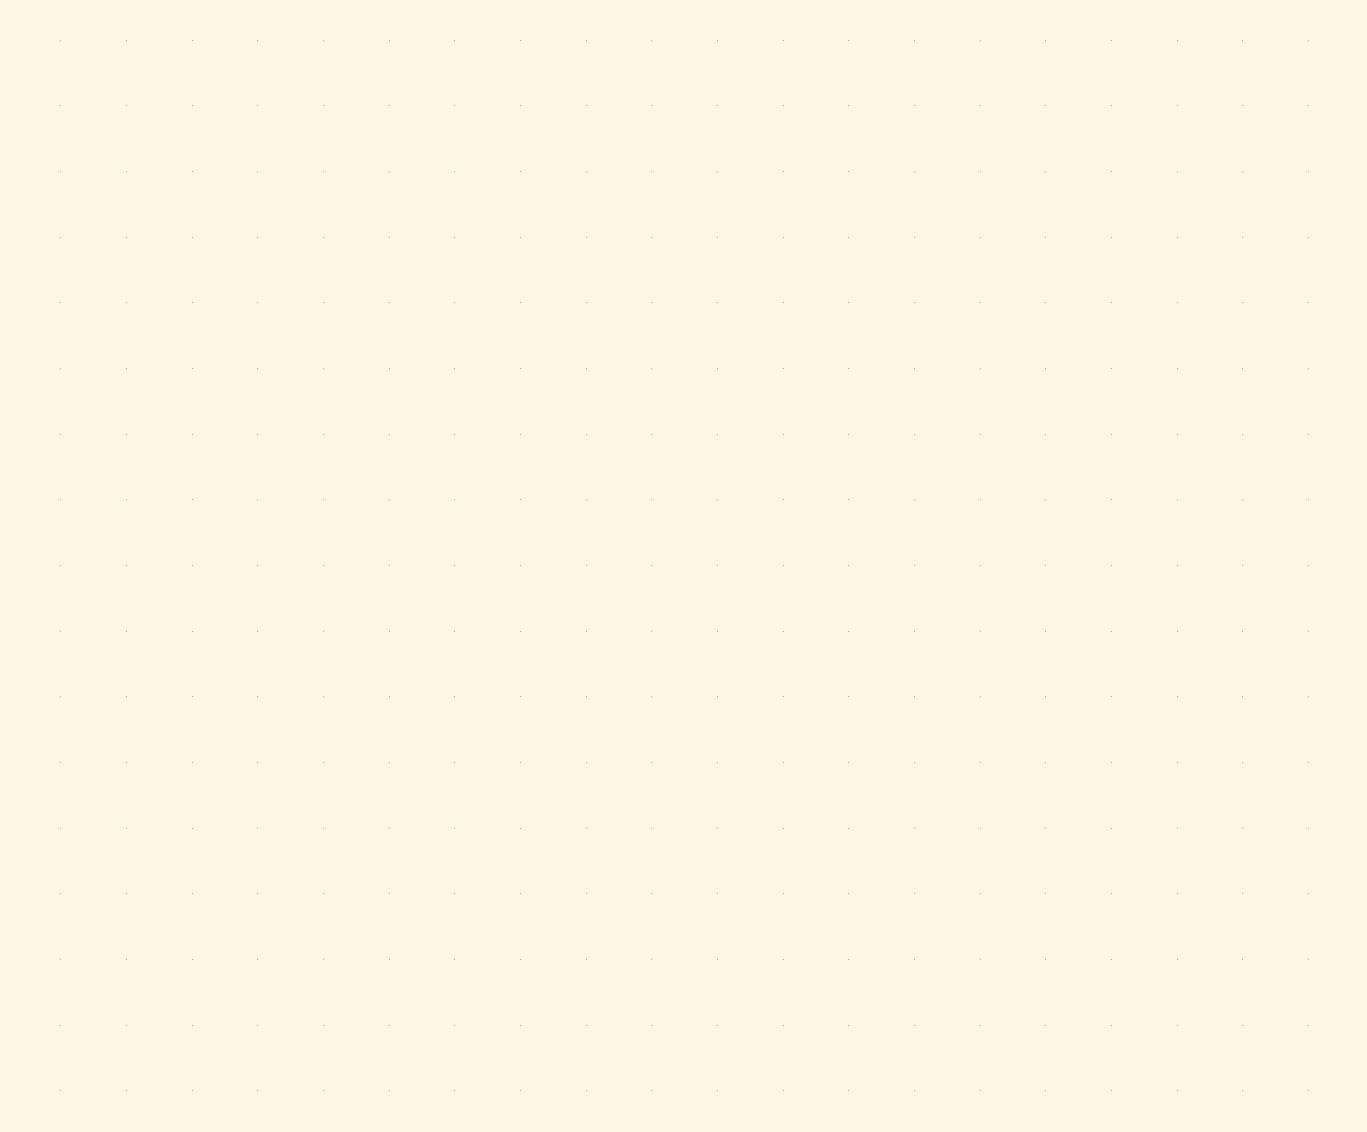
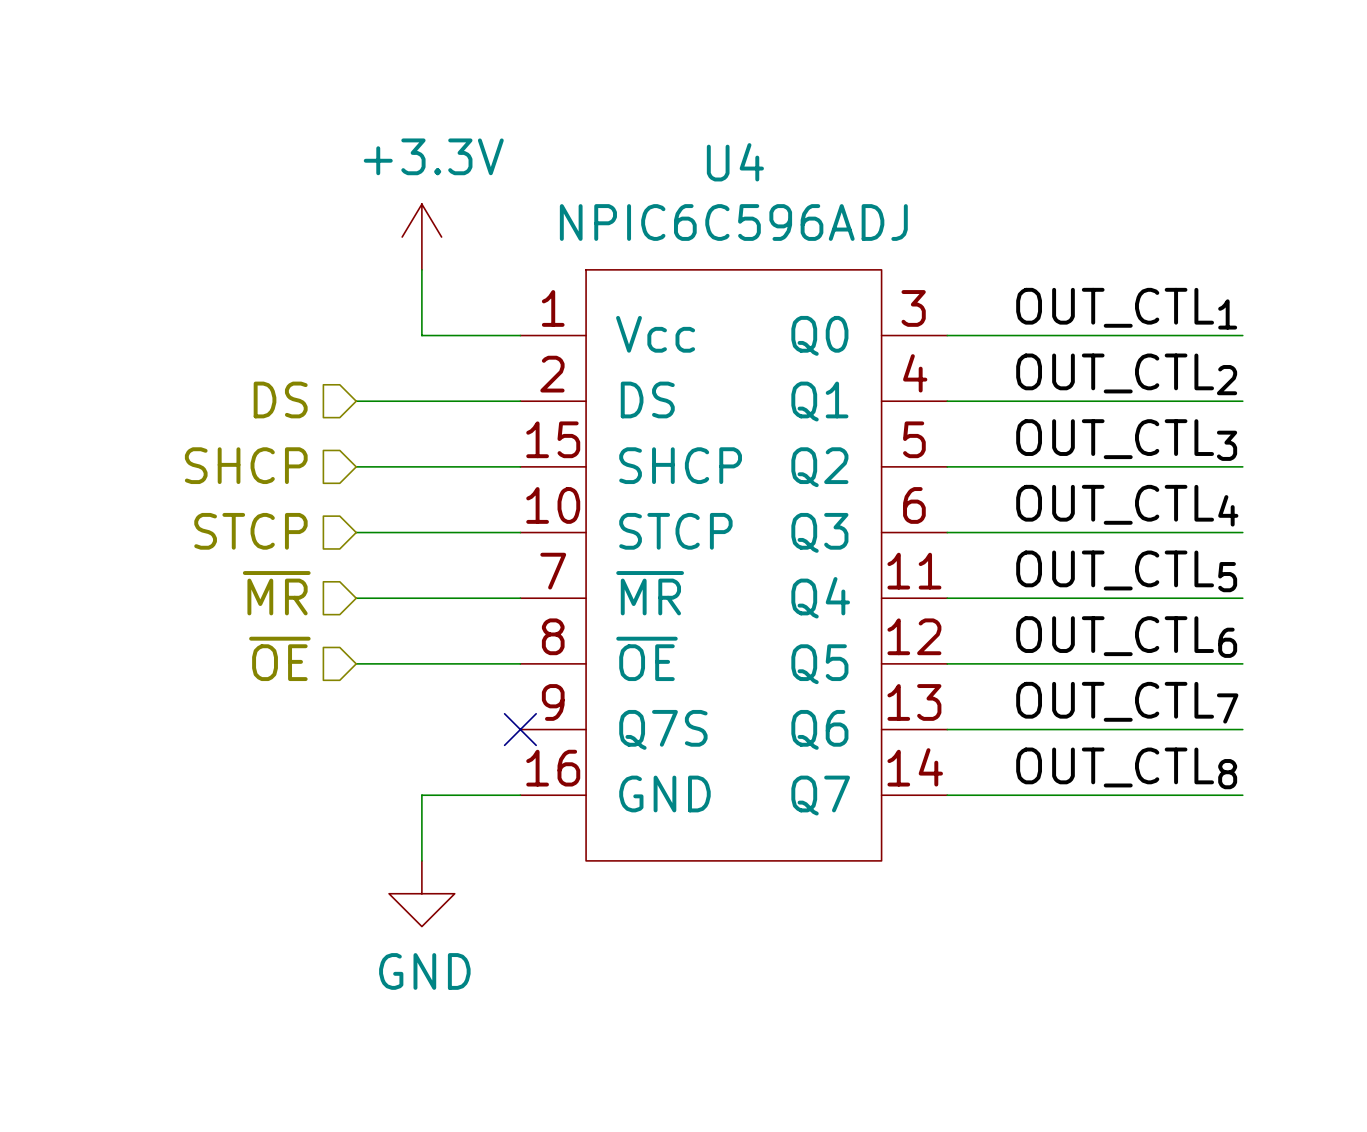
power symbol: none -> +3.3V (421, 237)
wire: none -> (421, 269) (421, 335) (520, 335)
label: none -> OUT_CTL1 (1126, 308)
wire: none -> (947, 335) (1242, 335)
label: none -> OUT_CTL2 (1126, 374)
hierarchical label: none -> DS (280, 399)
wire: none -> (356, 401) (520, 401)
wire: none -> (947, 401) (1242, 401)
label: none -> OUT_CTL3 (1126, 440)
hierarchical label: none -> SHCP (246, 465)
wire: none -> (356, 466) (520, 466)
wire: none -> (947, 466) (1242, 466)
label: none -> OUT_CTL4 (1127, 505)
hierarchical label: none -> STCP (250, 531)
wire: none -> (356, 532) (520, 532)
wire: none -> (947, 532) (1242, 532)
U4: none -> NPIC6C596ADJ (733, 565)
label: none -> OUT_CTL5 (1126, 571)
hierarchical label: none -> ~{MR} (276, 593)
wire: none -> (356, 598) (520, 598)
wire: none -> (947, 598) (1242, 598)
label: none -> OUT_CTL6 (1126, 637)
hierarchical label: none -> ~{OE} (279, 658)
wire: none -> (356, 663) (520, 663)
wire: none -> (947, 663) (1242, 663)
label: none -> OUT_CTL7 (1127, 702)
no-connect mark: none -> (520, 729)
wire: none -> (947, 729) (1242, 729)
label: none -> OUT_CTL8 (1126, 768)
wire: none -> (520, 795) (421, 795) (421, 860)
wire: none -> (947, 795) (1242, 795)
power symbol: none -> GND (421, 893)

